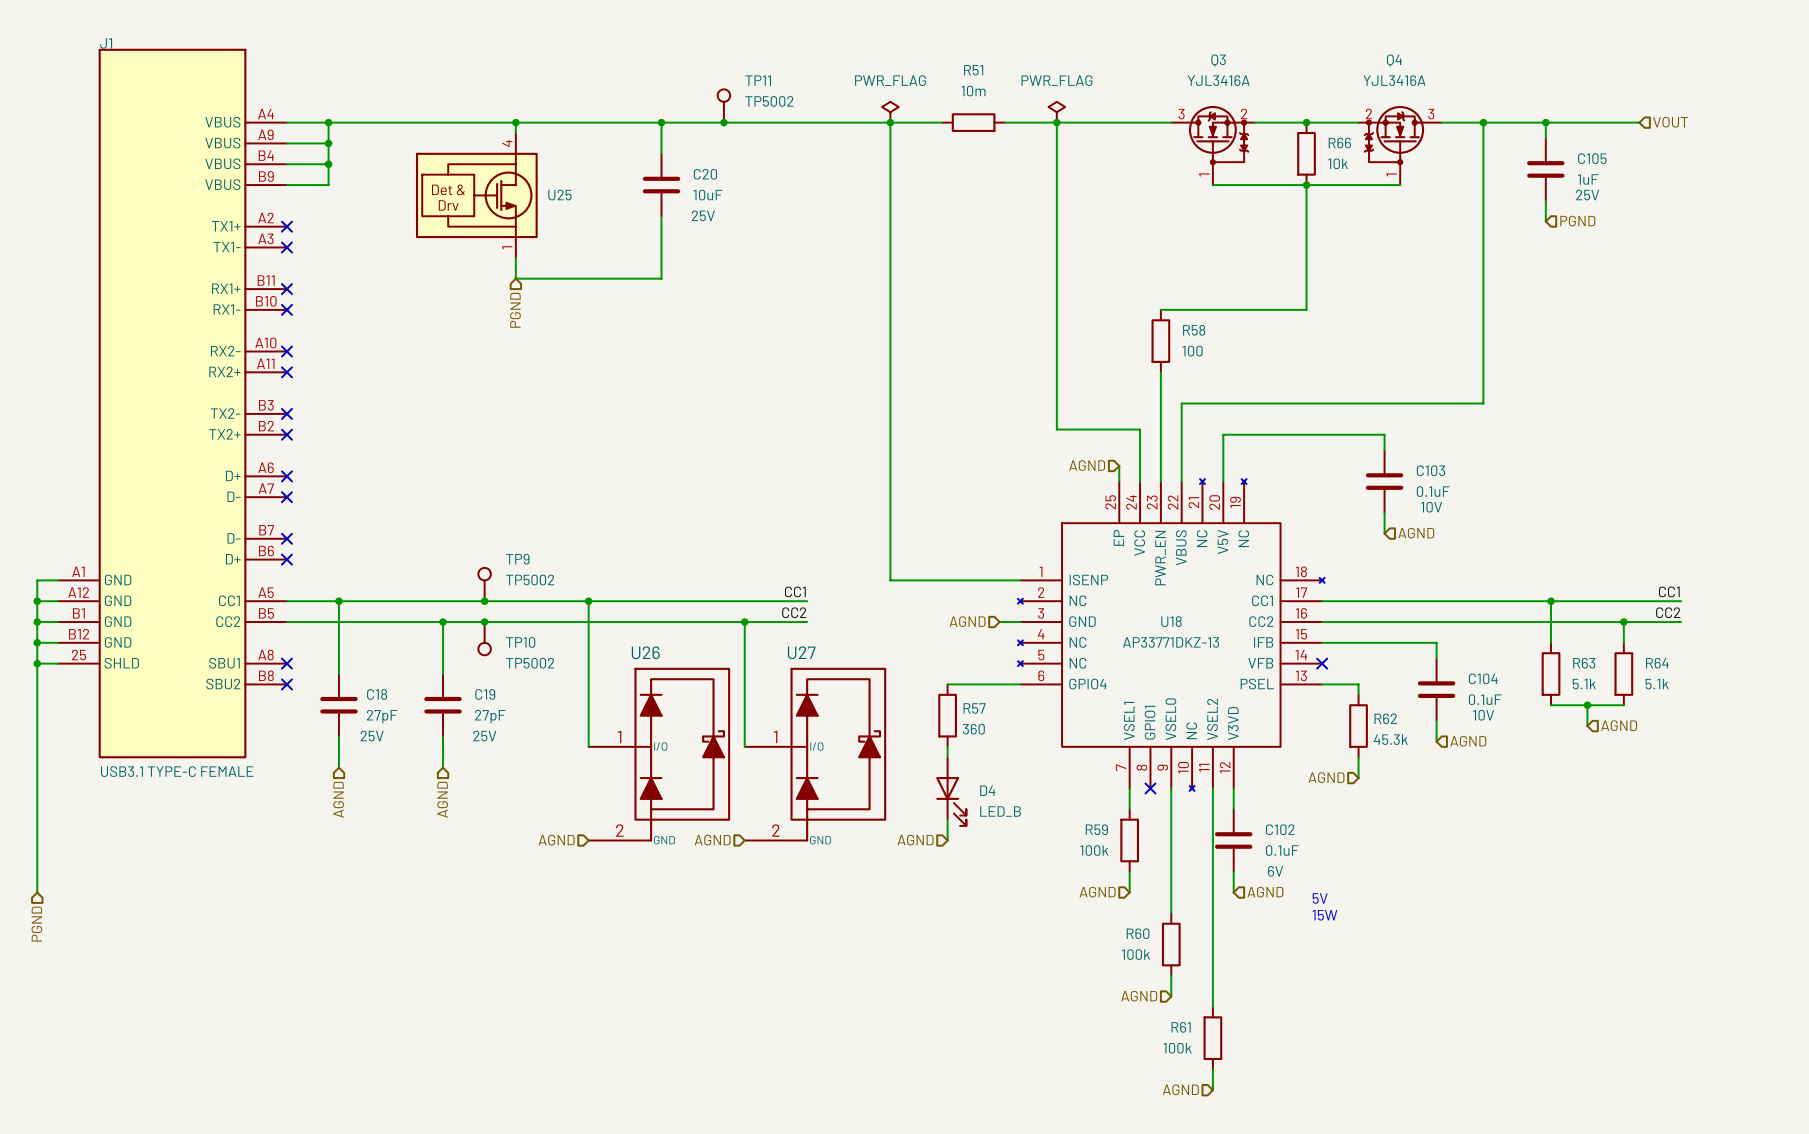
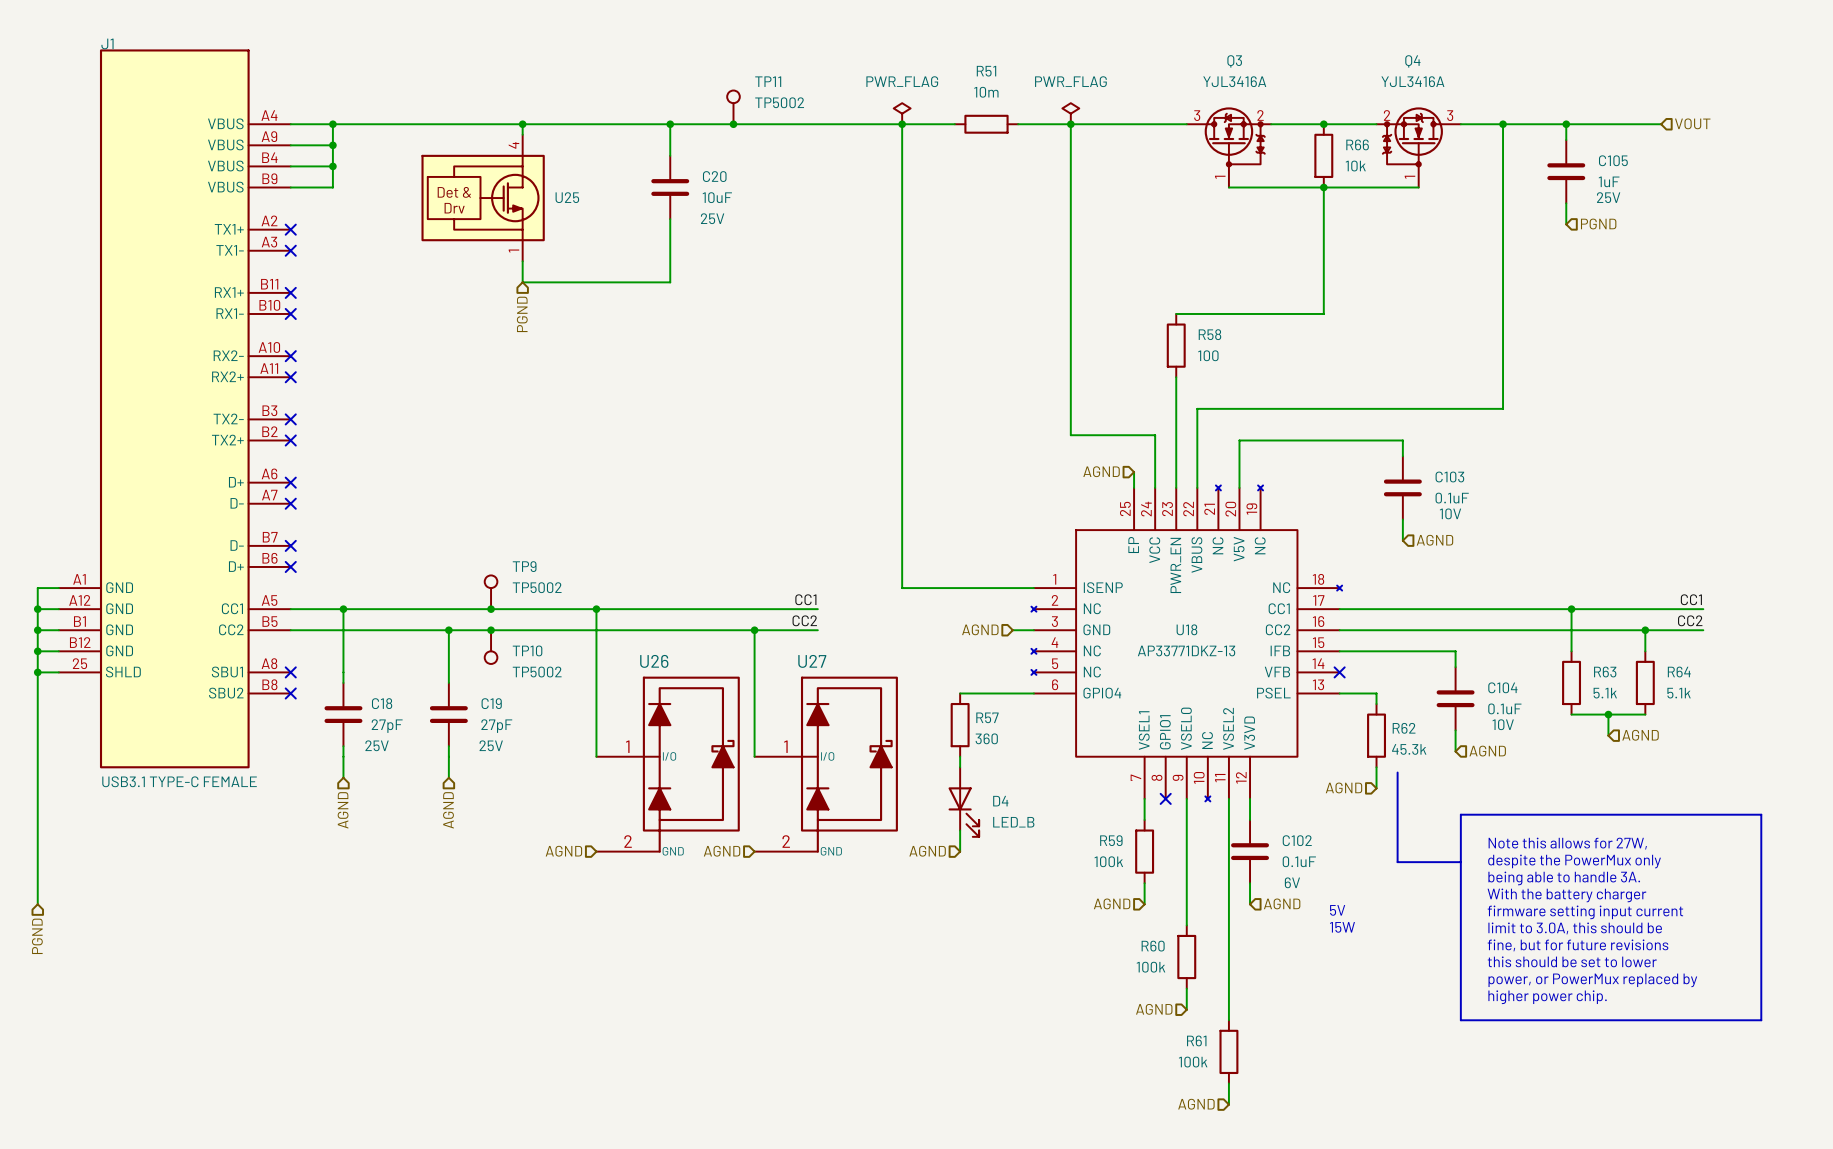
line: none -> (1397, 772) (1397, 862) (1460, 862)
line: none -> (1460, 814) (1761, 814) (1761, 1020) (1460, 1020) (1460, 814)
text: none -> Note this allows for 27W, (1567, 843)
text: none -> despite the PowerMux only (1574, 861)
text: none -> being able to handle 3A. (1564, 878)
text: none -> With the battery charger (1566, 895)
text: none -> firmware setting input current (1585, 912)
text: none -> limit to 3.0A, this should be (1575, 928)
text: none -> fine, but for future revisions (1578, 945)
text: none -> this should be set to lower (1572, 961)
text: none -> power, or PowerMux replaced by (1592, 980)
text: none -> higher power chip. (1547, 997)

